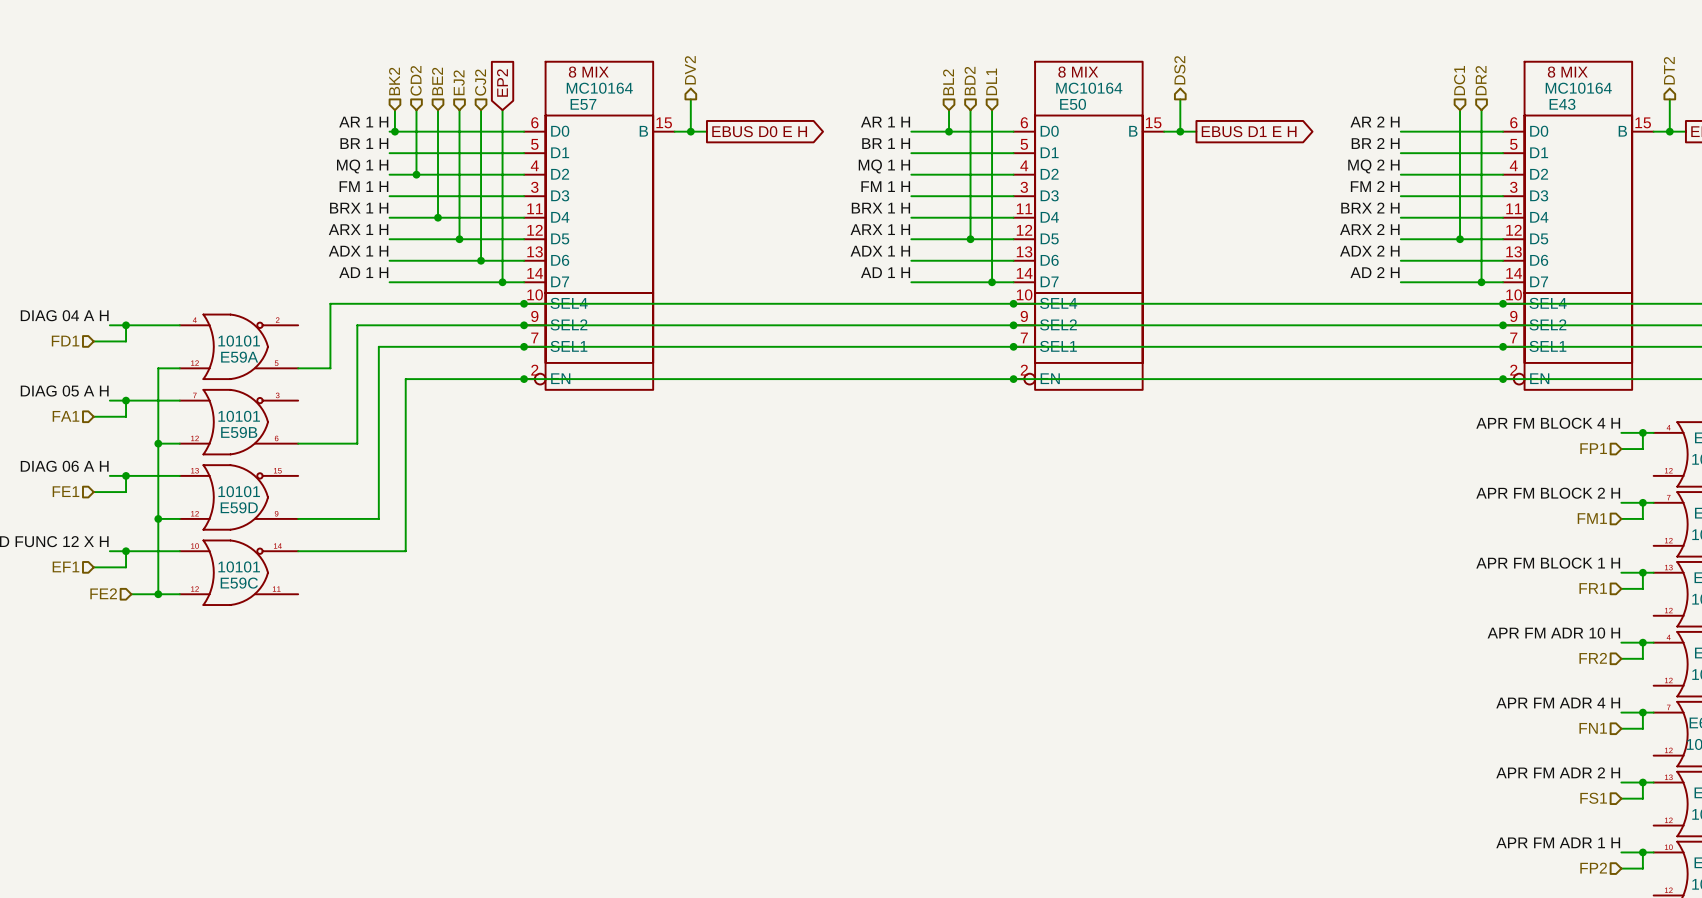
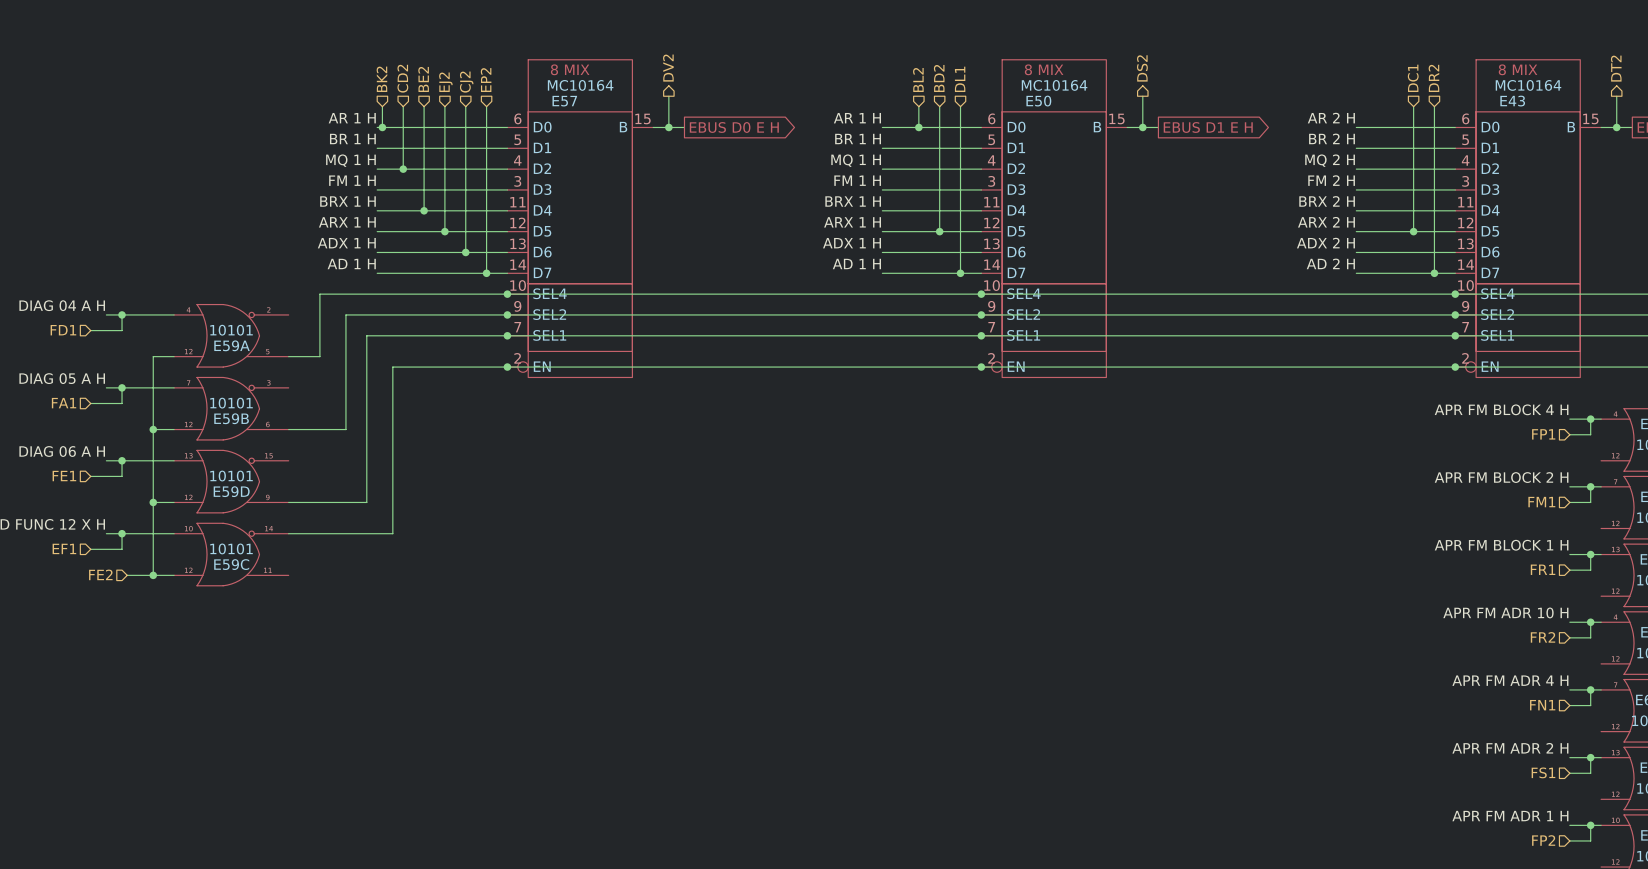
hierarchical label: none -> EP2 (486, 80)
global label: EP2 (502, 83) -> none

